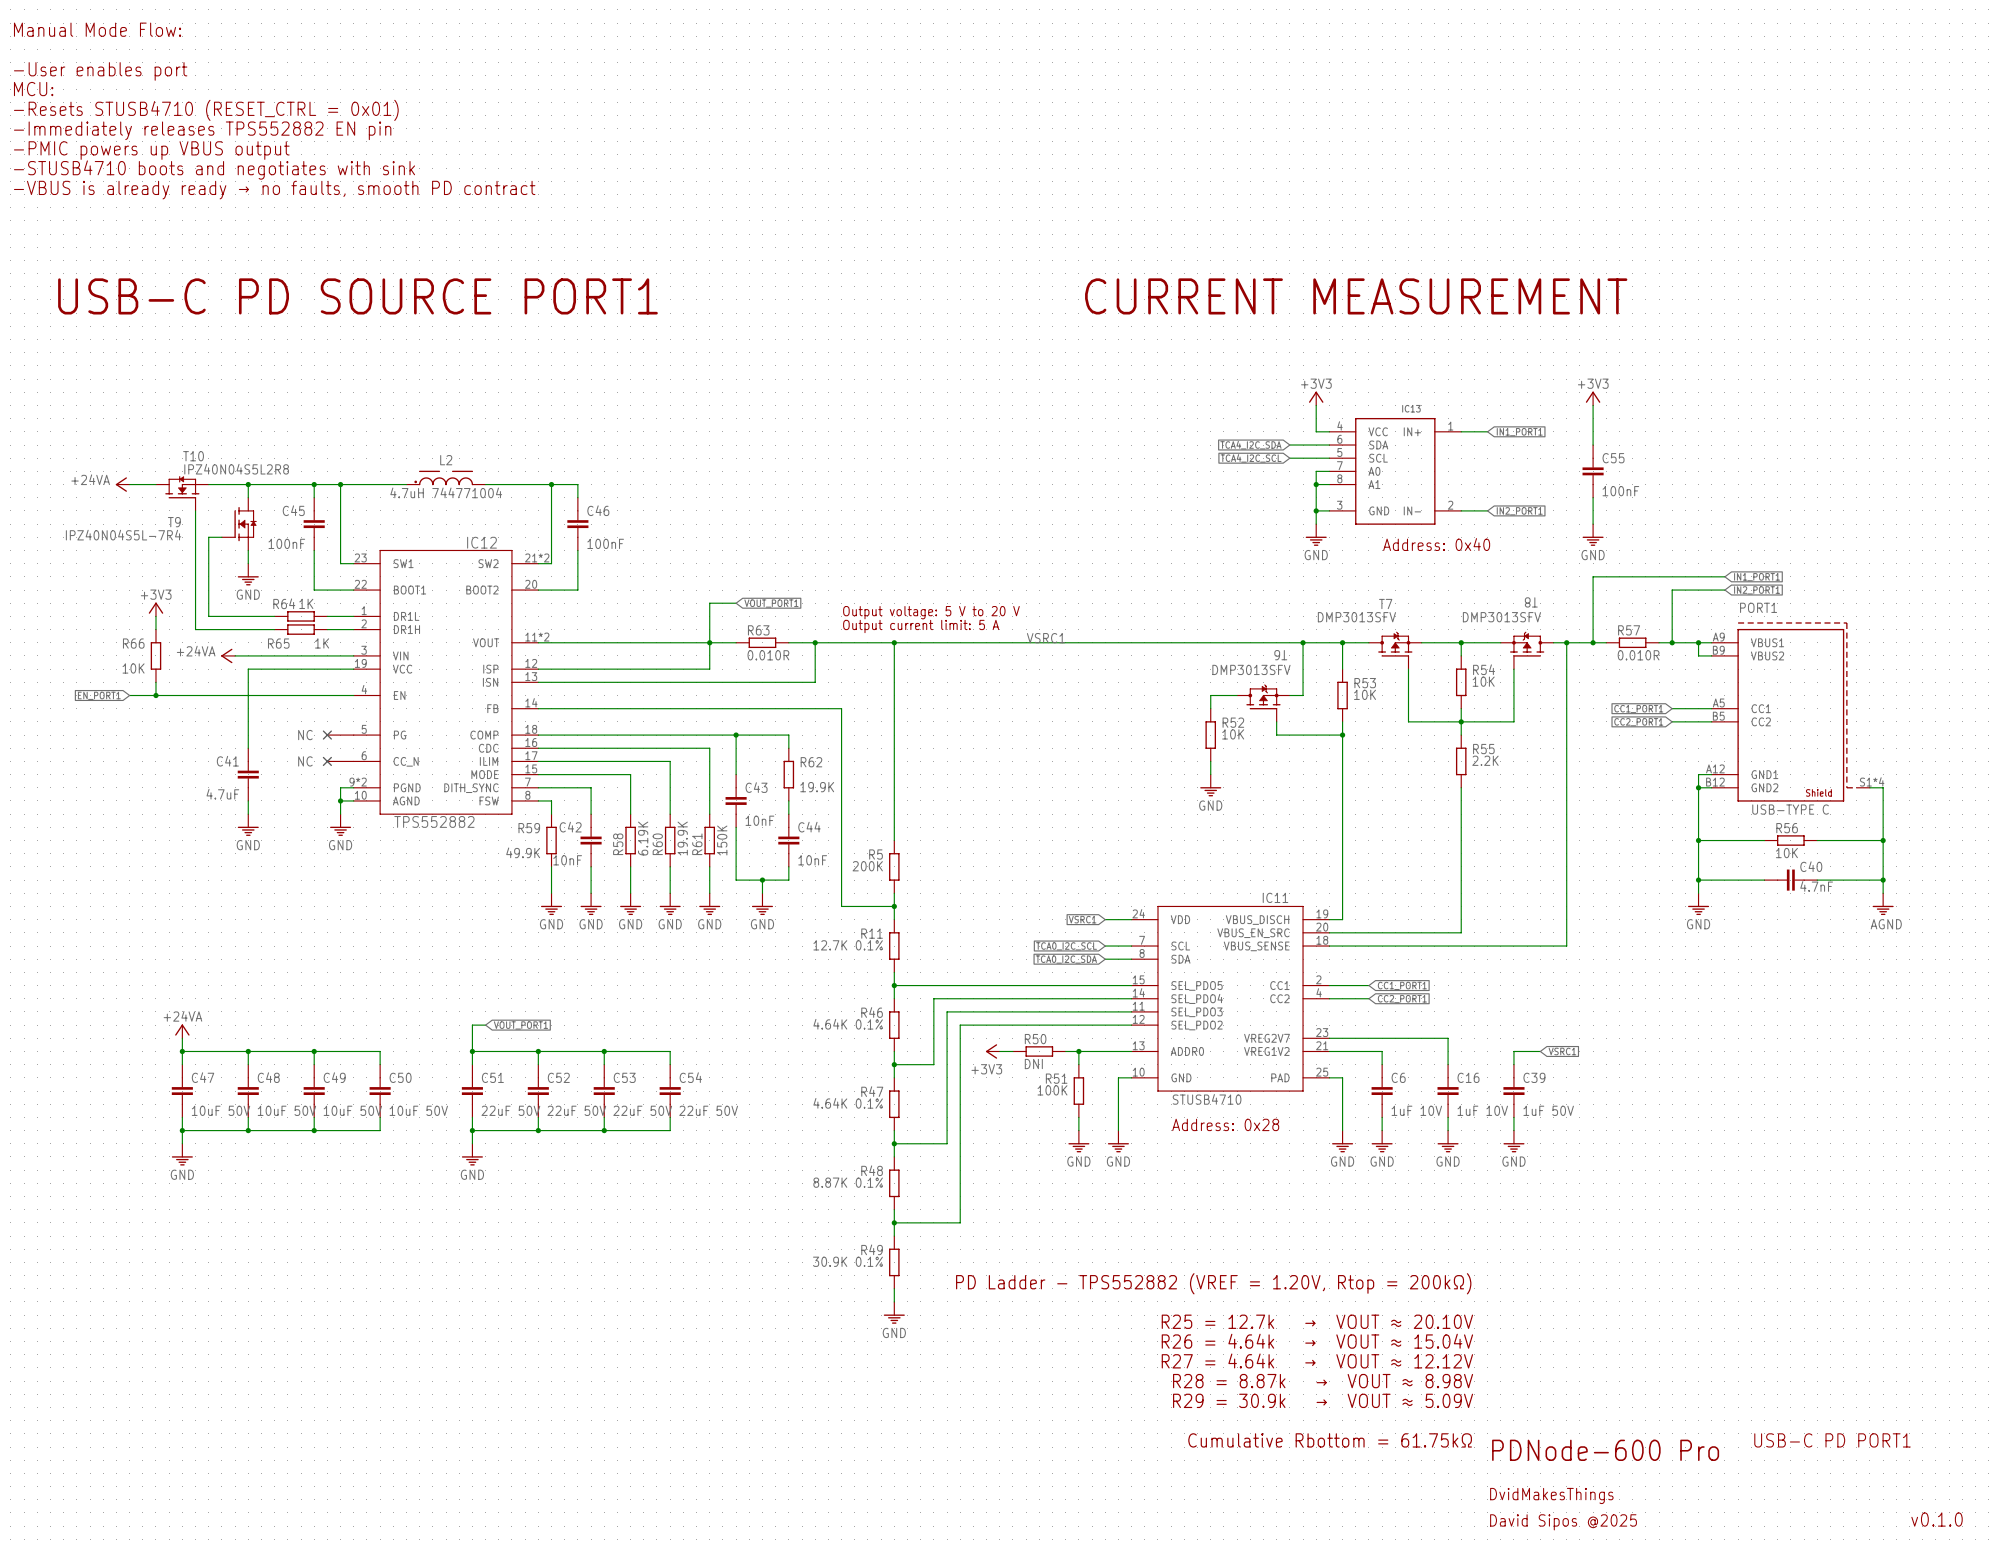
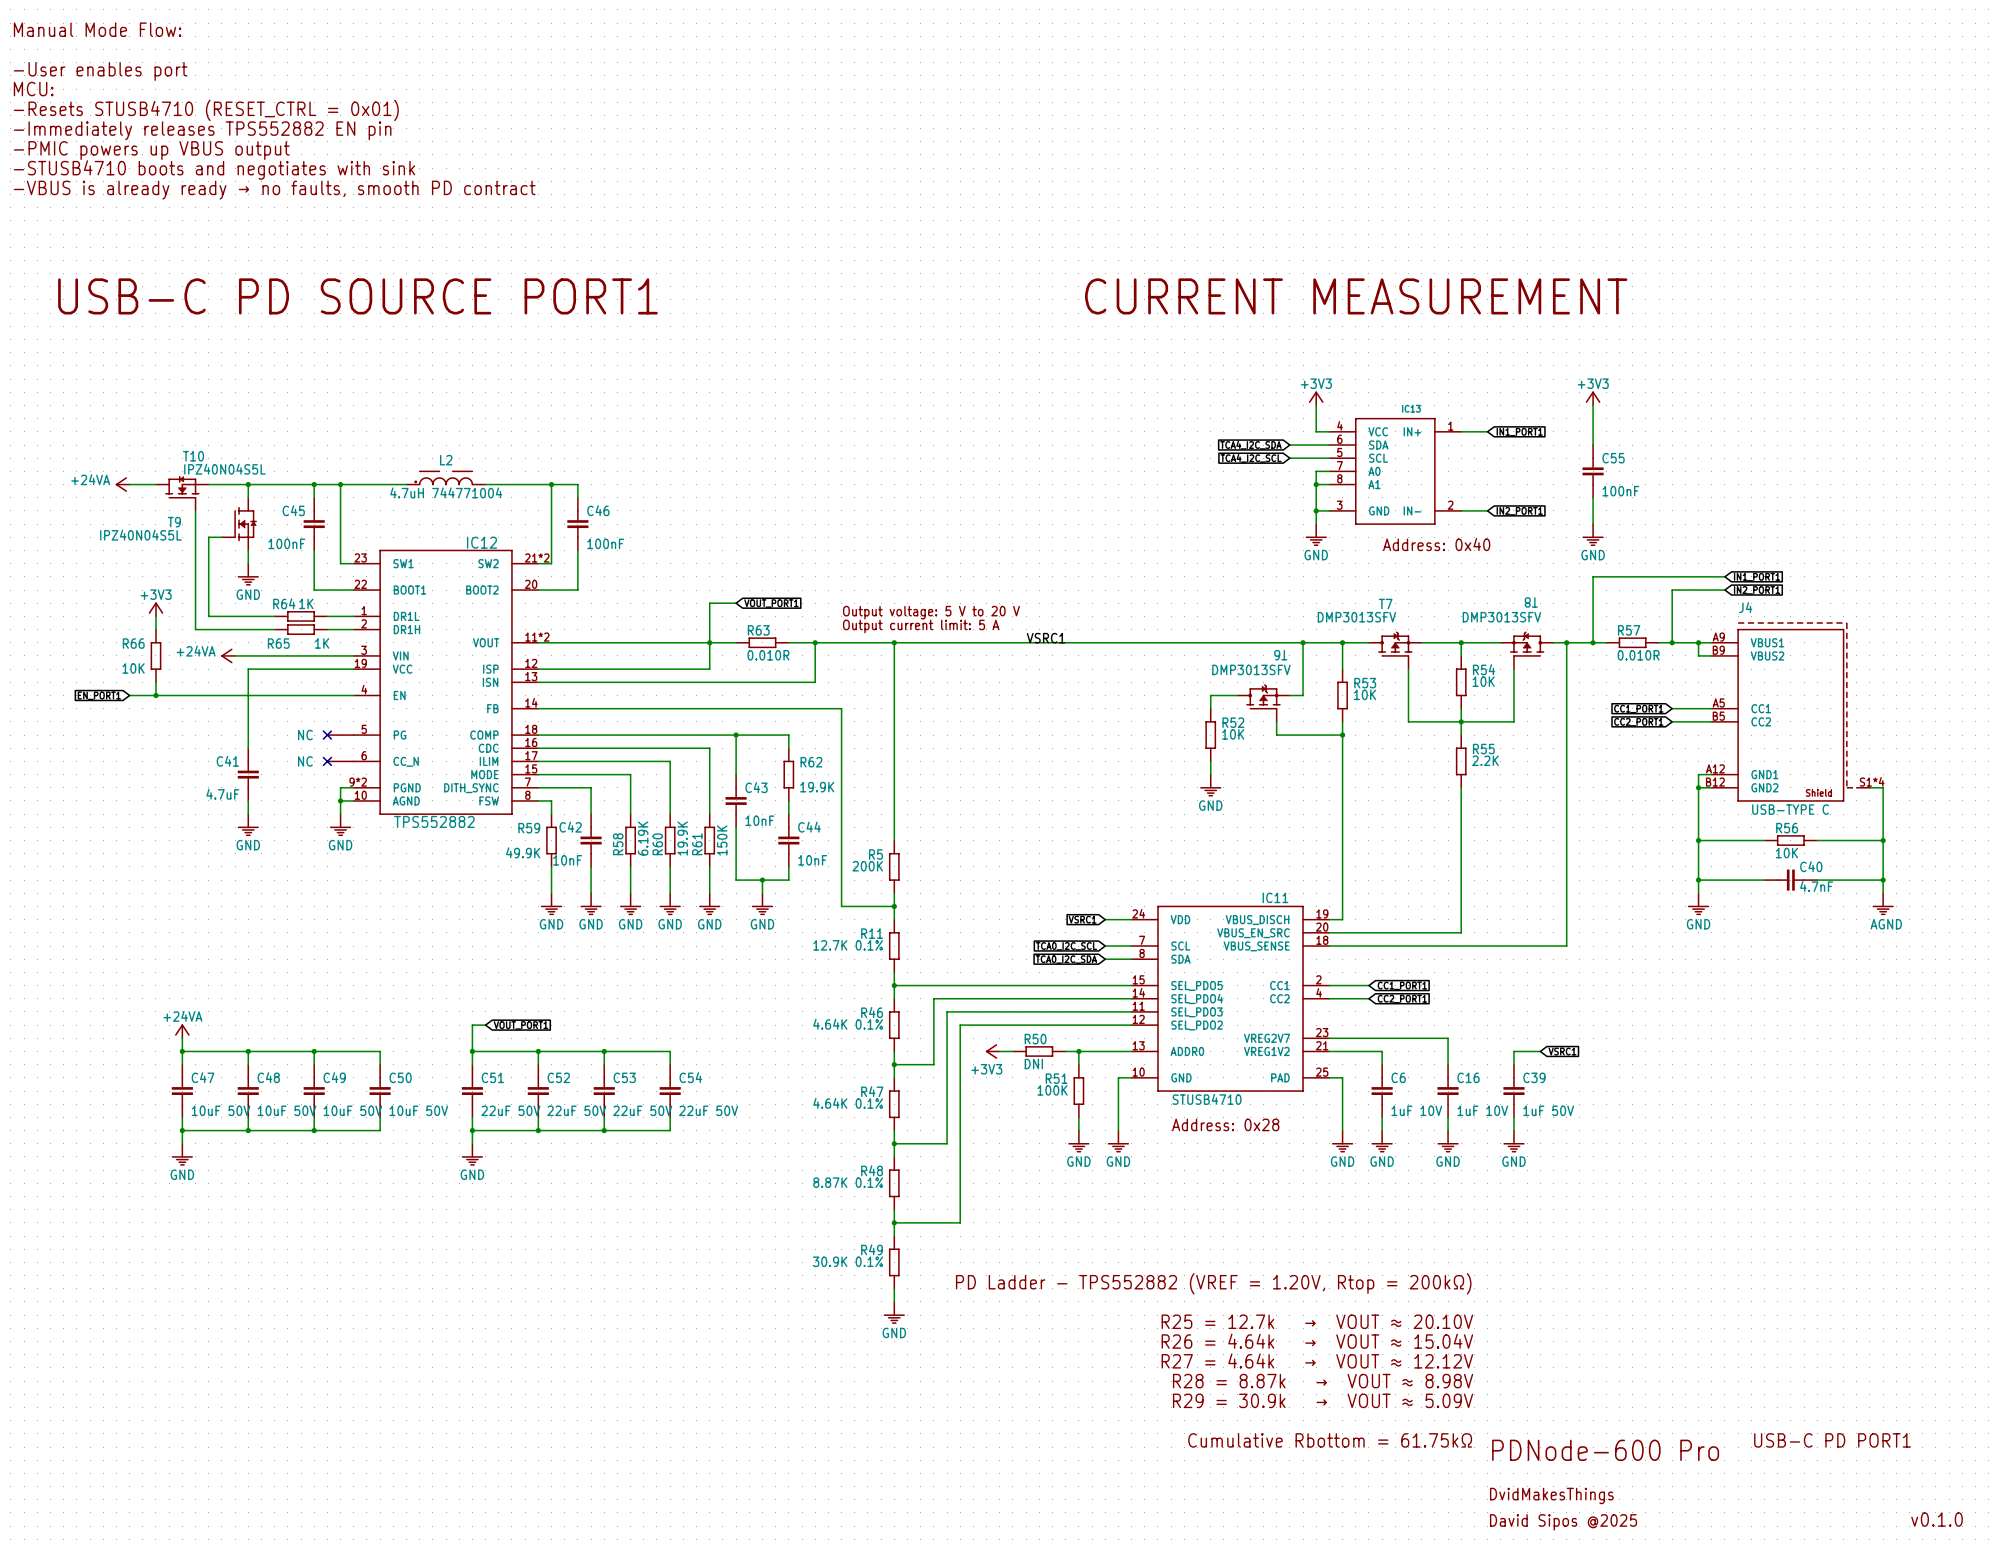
T10 value: IPZ40N04S5L2R8 (236, 469) -> IPZ40N04S5L (224, 469)
T9 value: IPZ40N04S5L-7R4 (123, 535) -> IPZ40N04S5L (140, 535)
PORT1 name: PORT1 (1758, 607) -> J4 (1745, 607)

